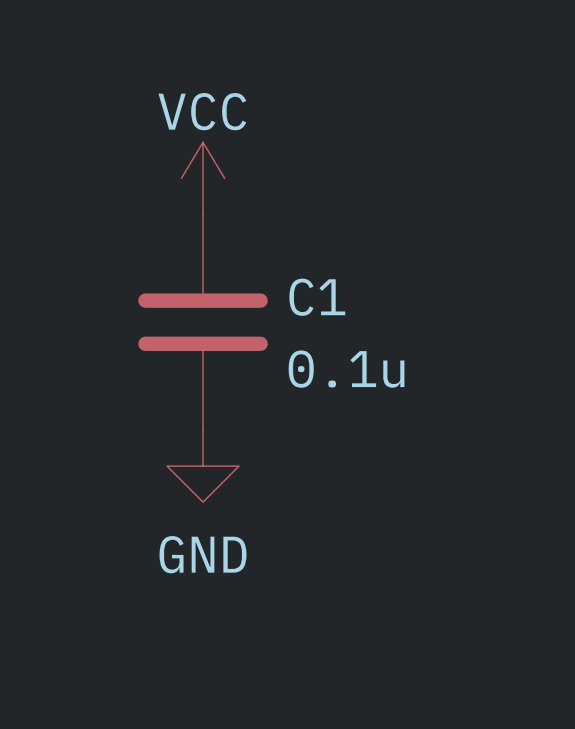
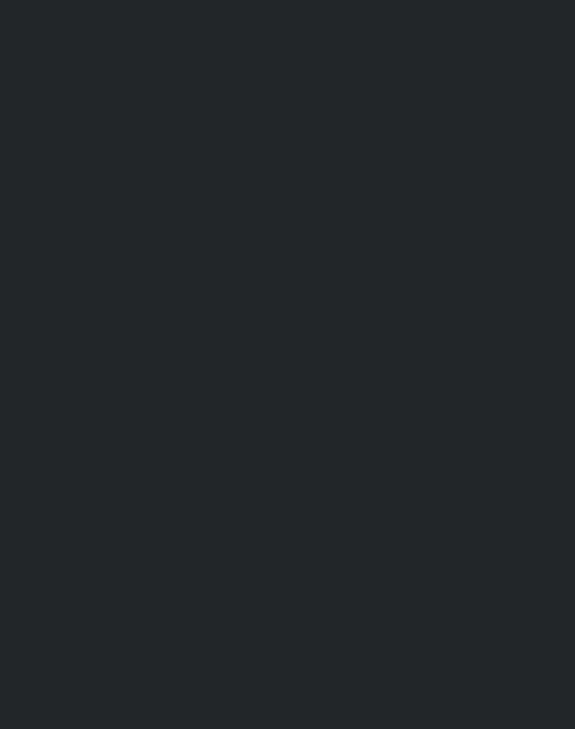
power symbol: VCC (203, 178) -> none
C1: 0.1u (203, 322) -> none
power symbol: GND (203, 466) -> none

